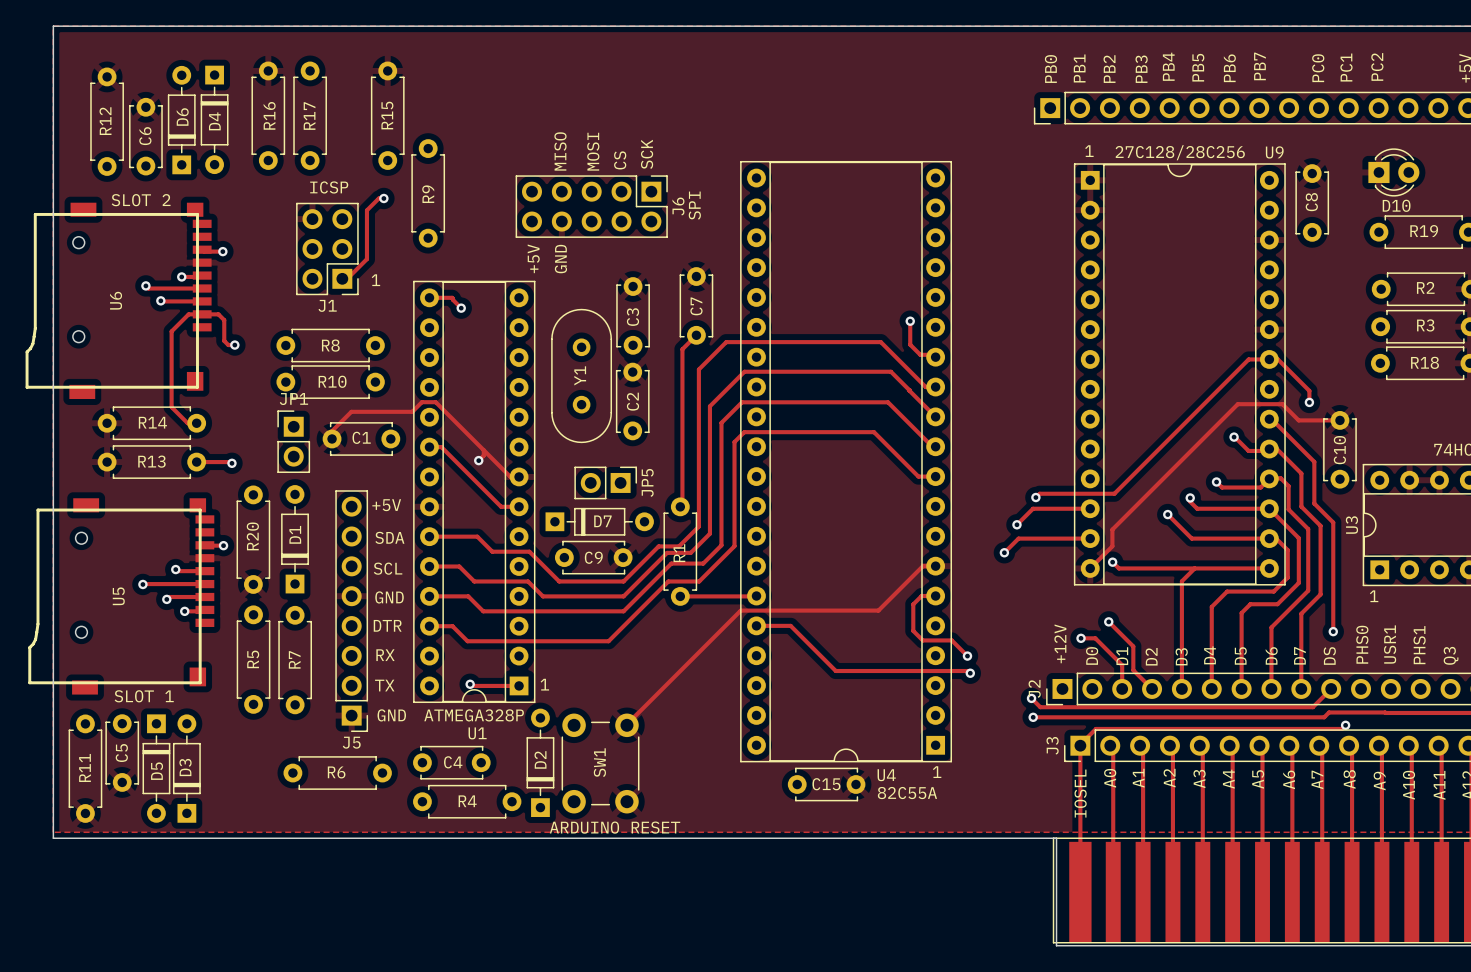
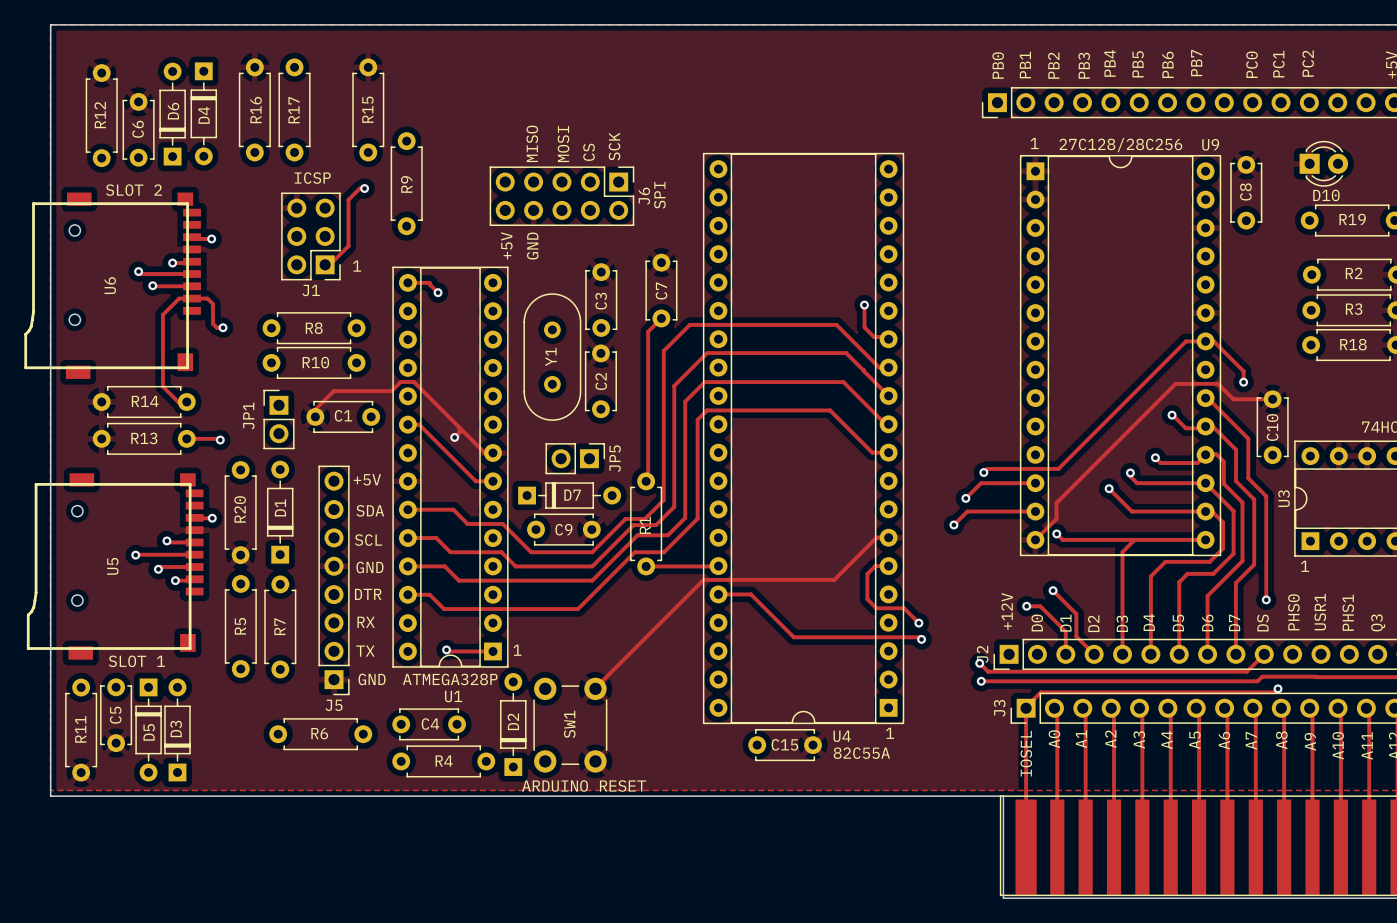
JP1 name rotation: 0° (293, 399) -> 90° counterclockwise (248, 415)
JP1 name position: JP1 (293, 399) -> JP1 (248, 415)

